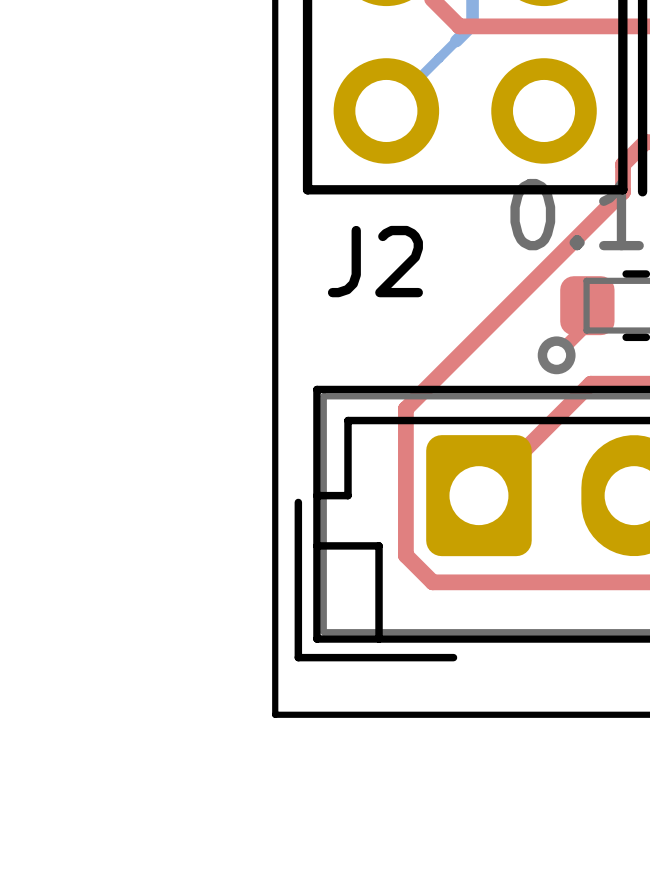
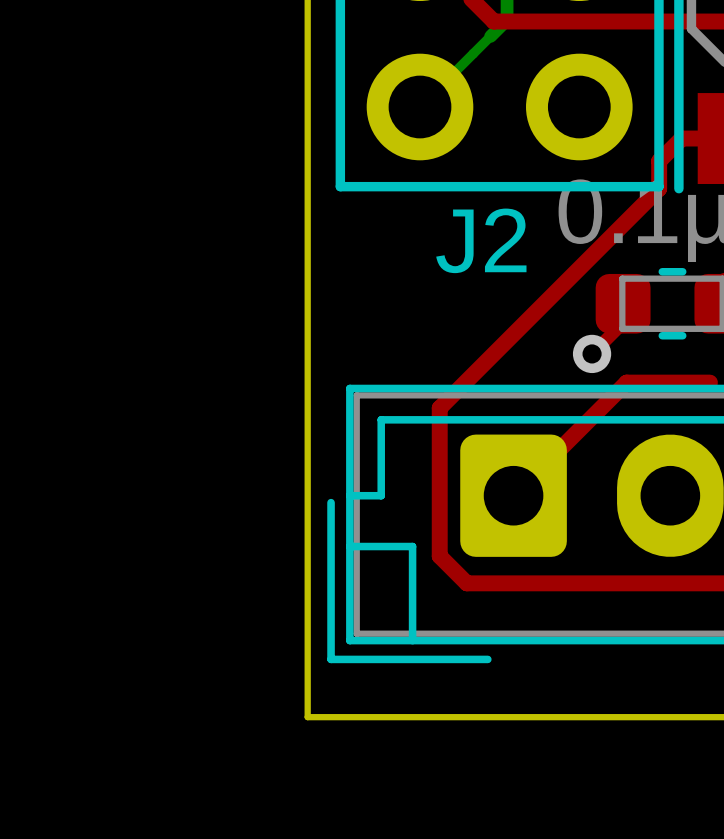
J2 name position: J2 (375, 261) -> J2 (481, 240)

